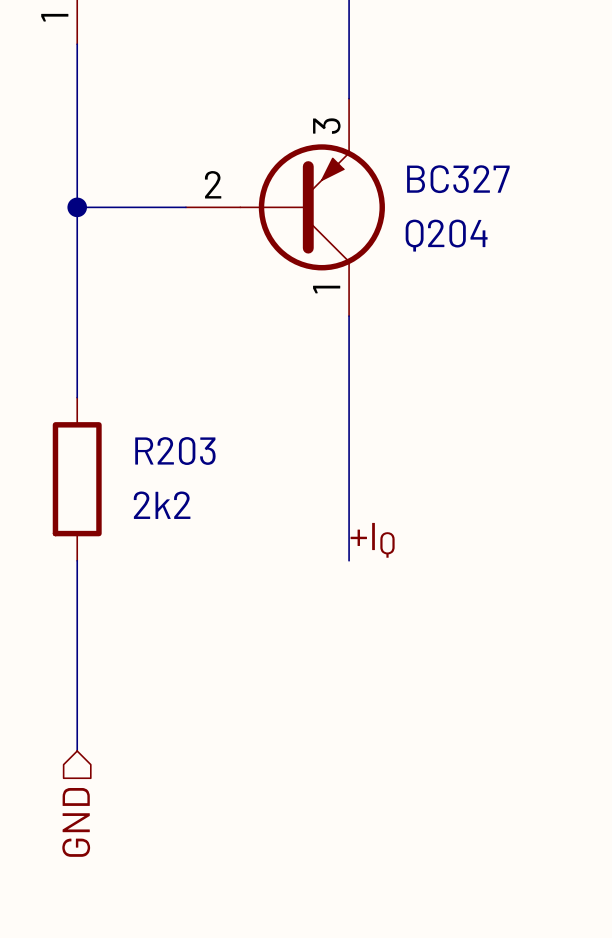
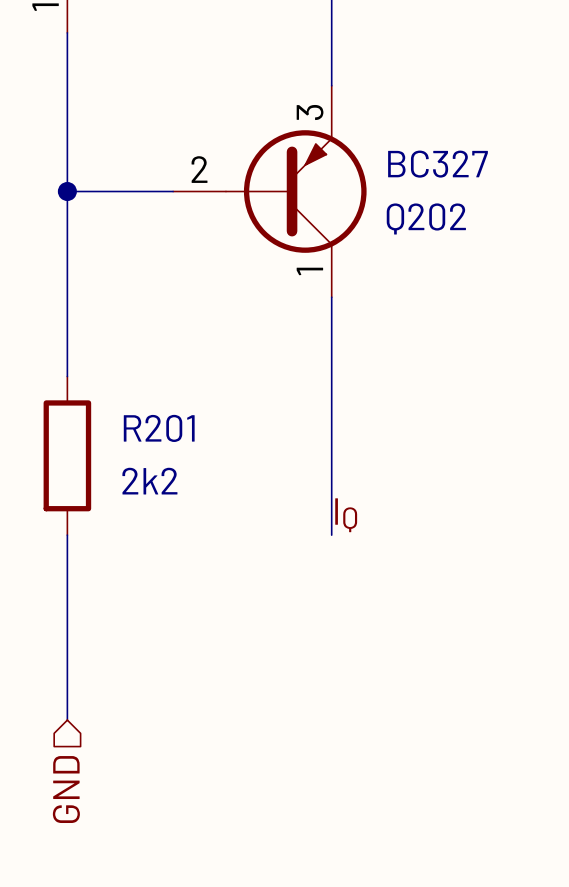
Q204 name: Q204 (446, 235) -> Q202 (426, 218)
R203 name: R203 (175, 451) -> R201 (159, 428)
label: +IQ (372, 540) -> IQ (346, 515)

